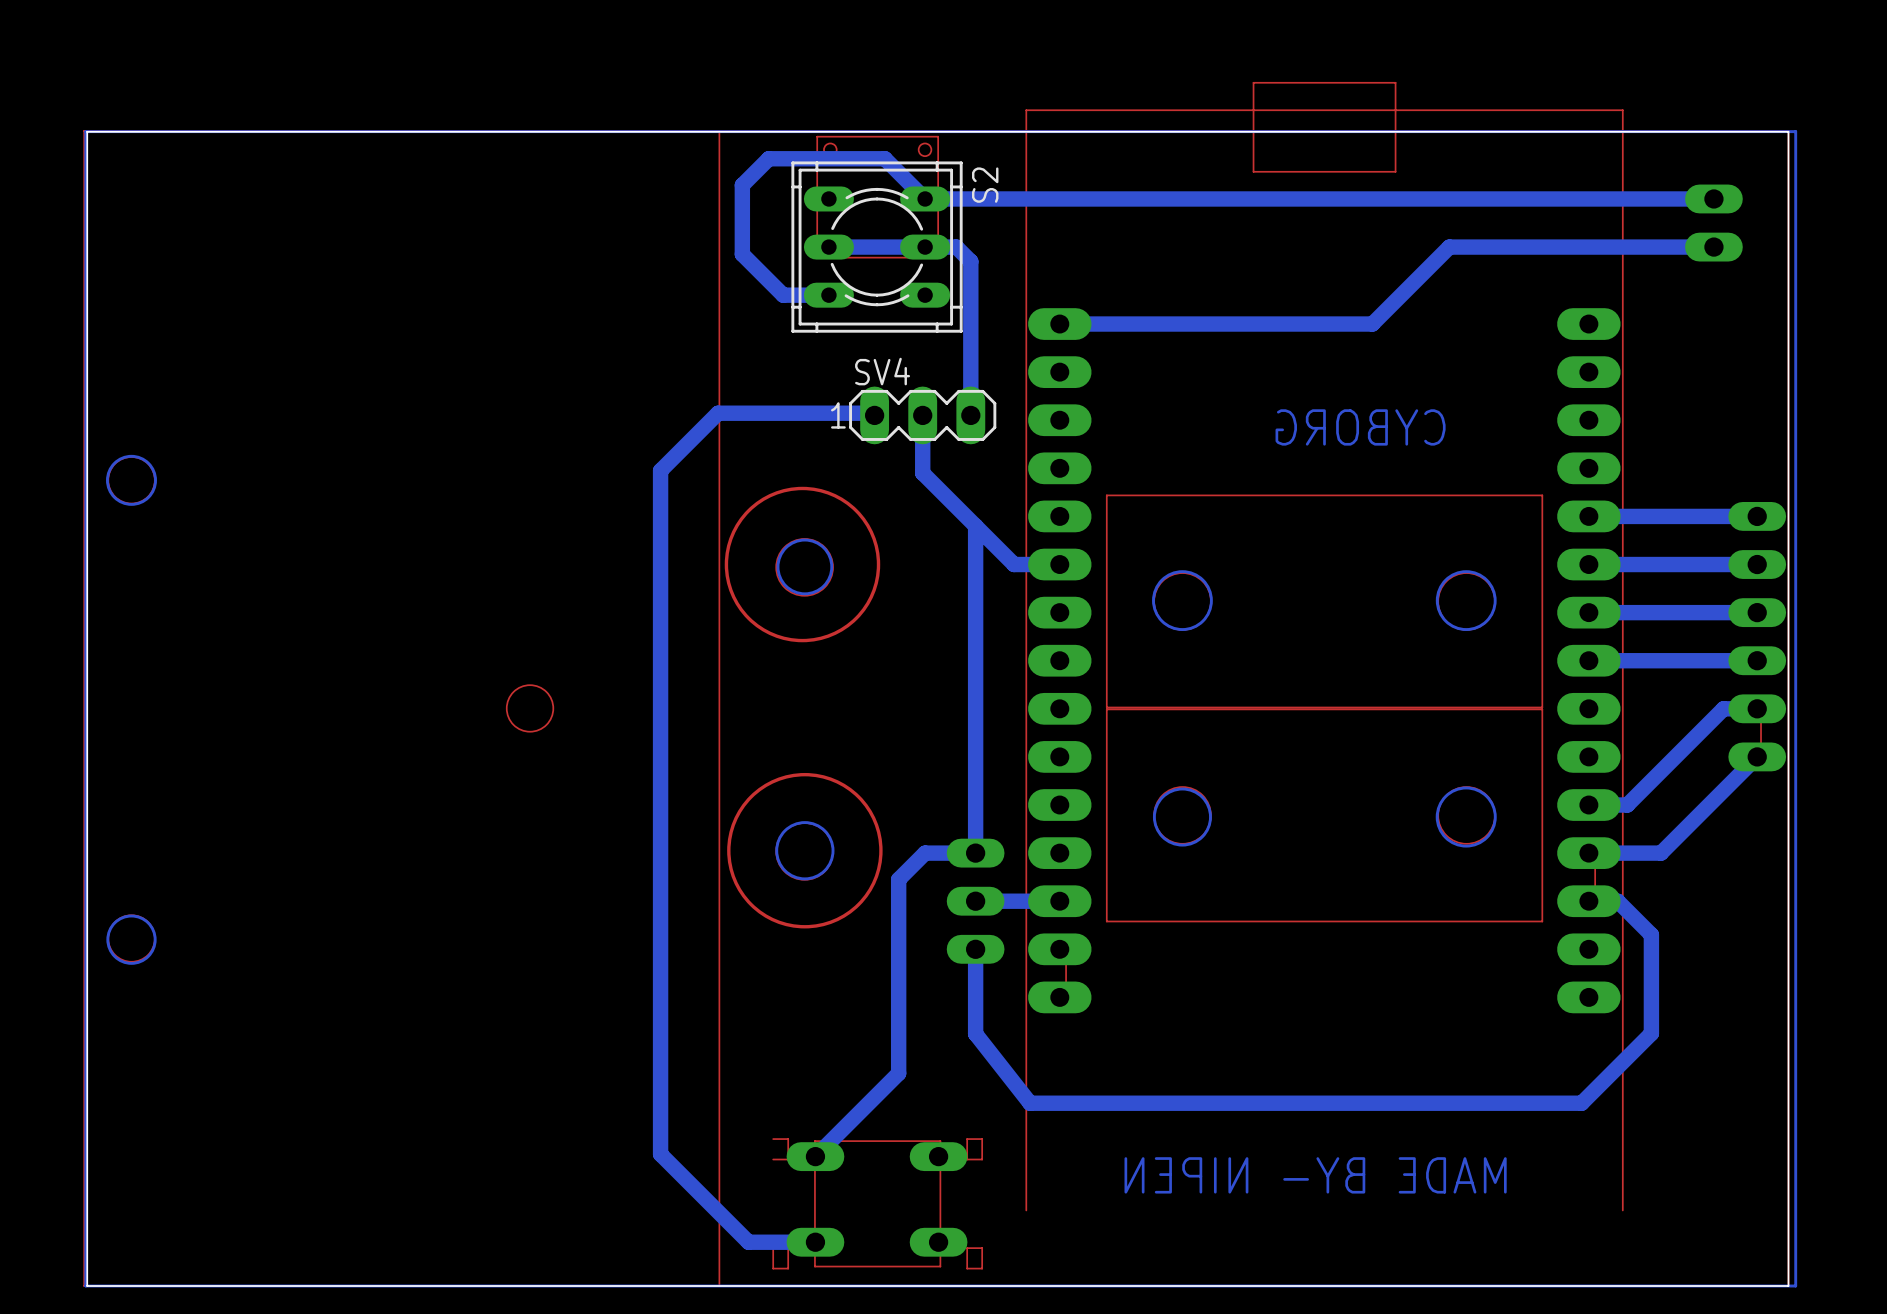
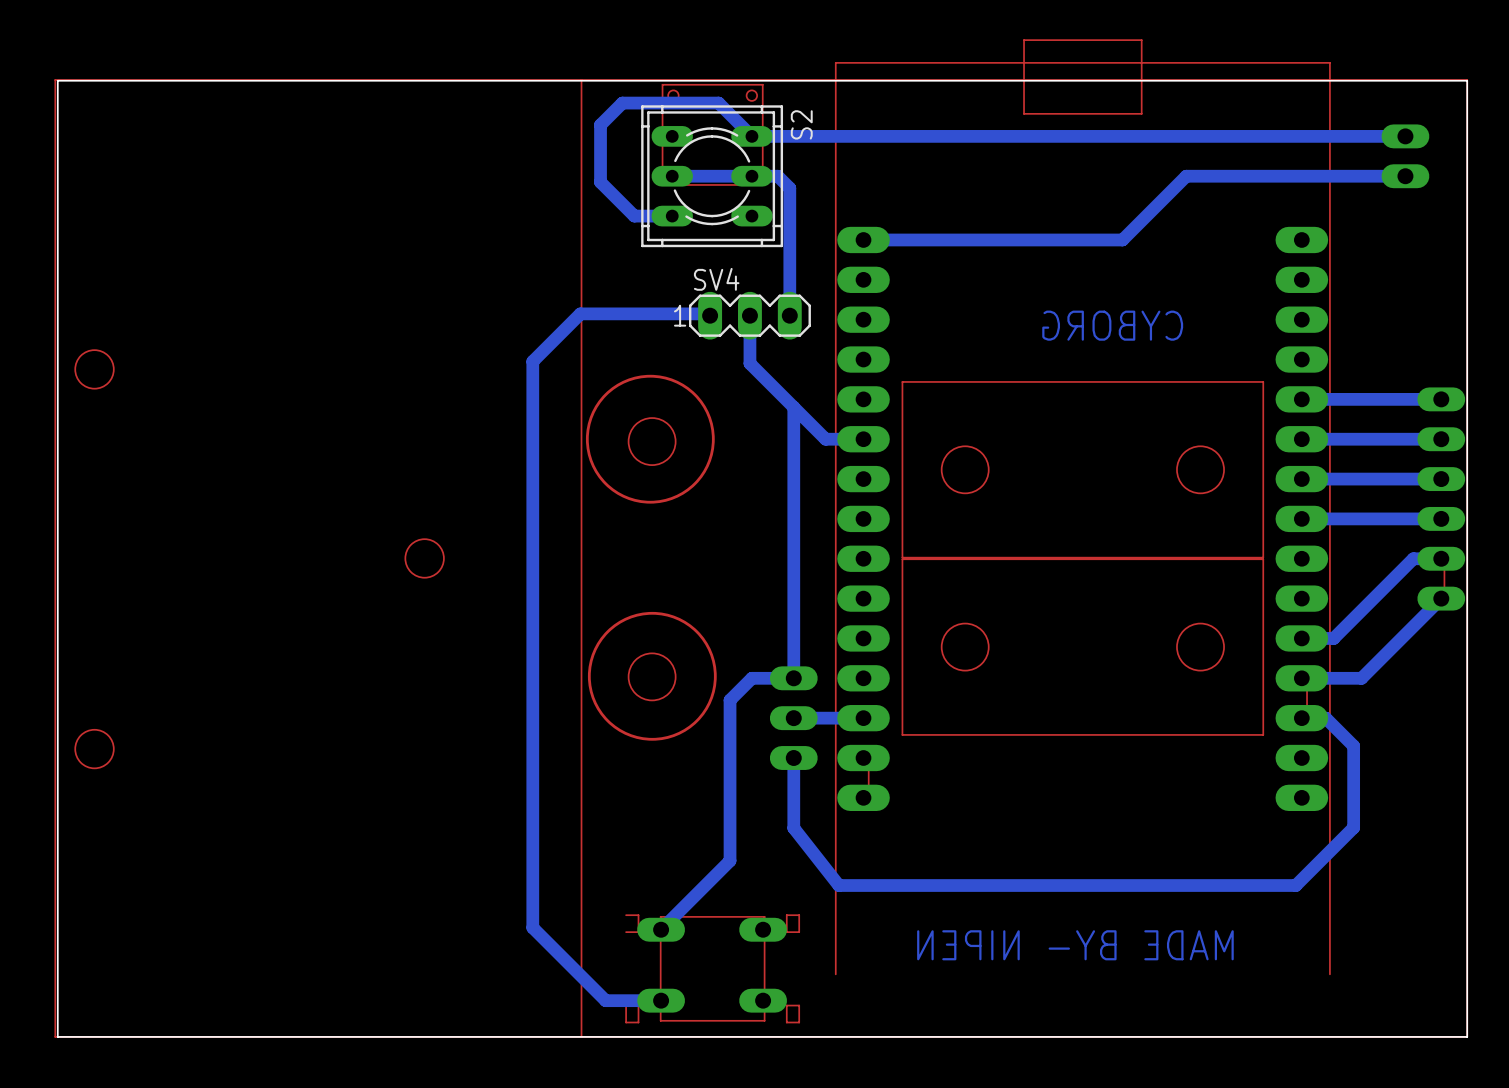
bottom track: (1795, 131) (85, 131) (85, 1286) (1795, 1286) (1795, 131) -> none
drawing: [106, 454, 157, 506] -> none
drawing: [776, 538, 834, 596] -> none
drawing: [1152, 570, 1213, 632] -> none
drawing: [1435, 570, 1497, 632] -> none
drawing: [1435, 786, 1497, 848] -> none
drawing: [1152, 787, 1212, 847] -> none
drawing: [775, 821, 835, 881] -> none
drawing: [106, 914, 157, 965] -> none

